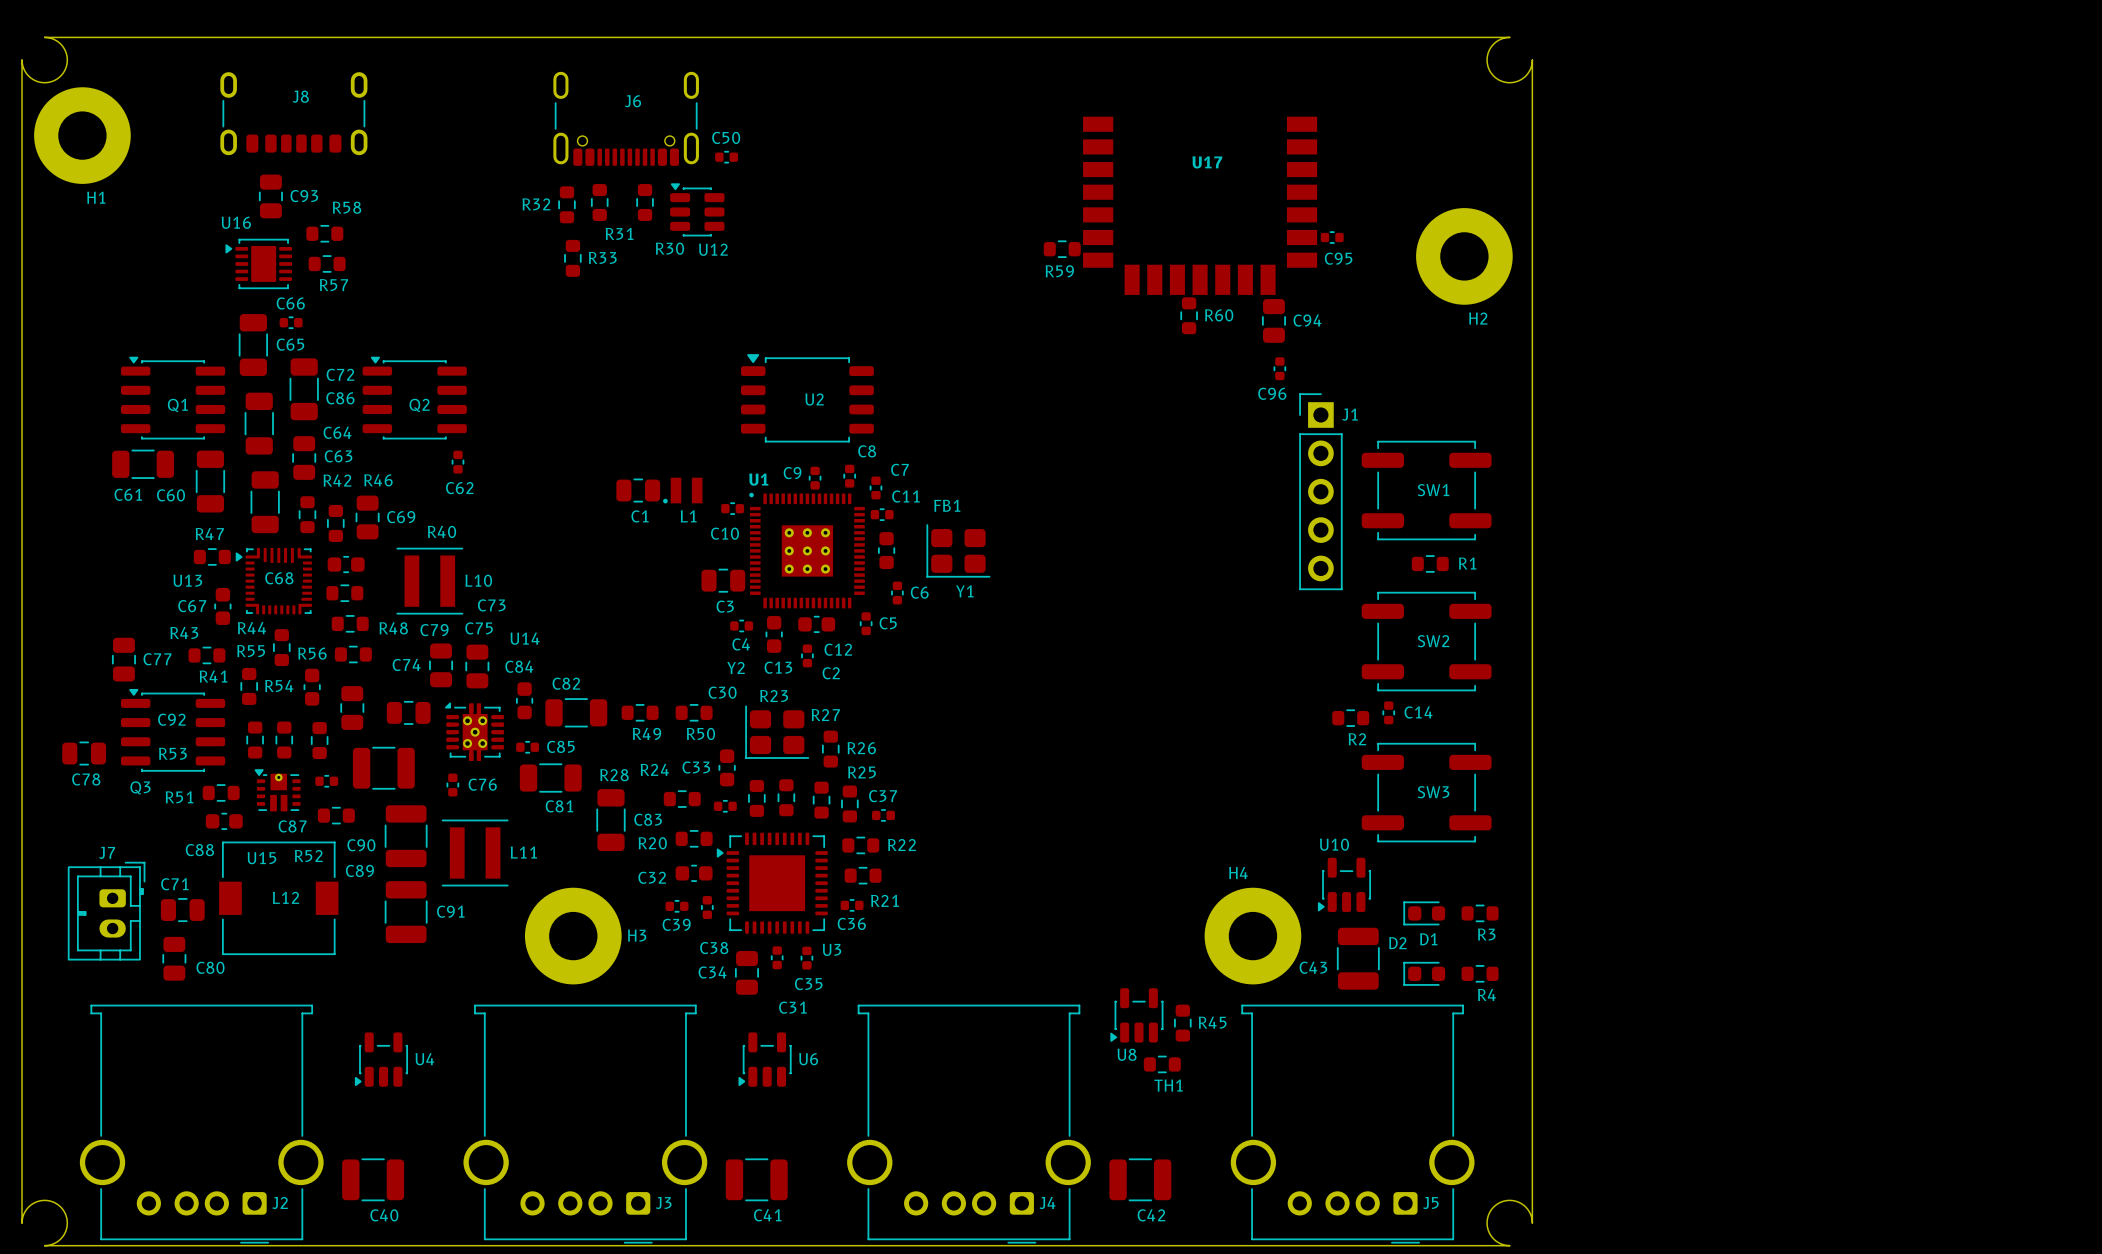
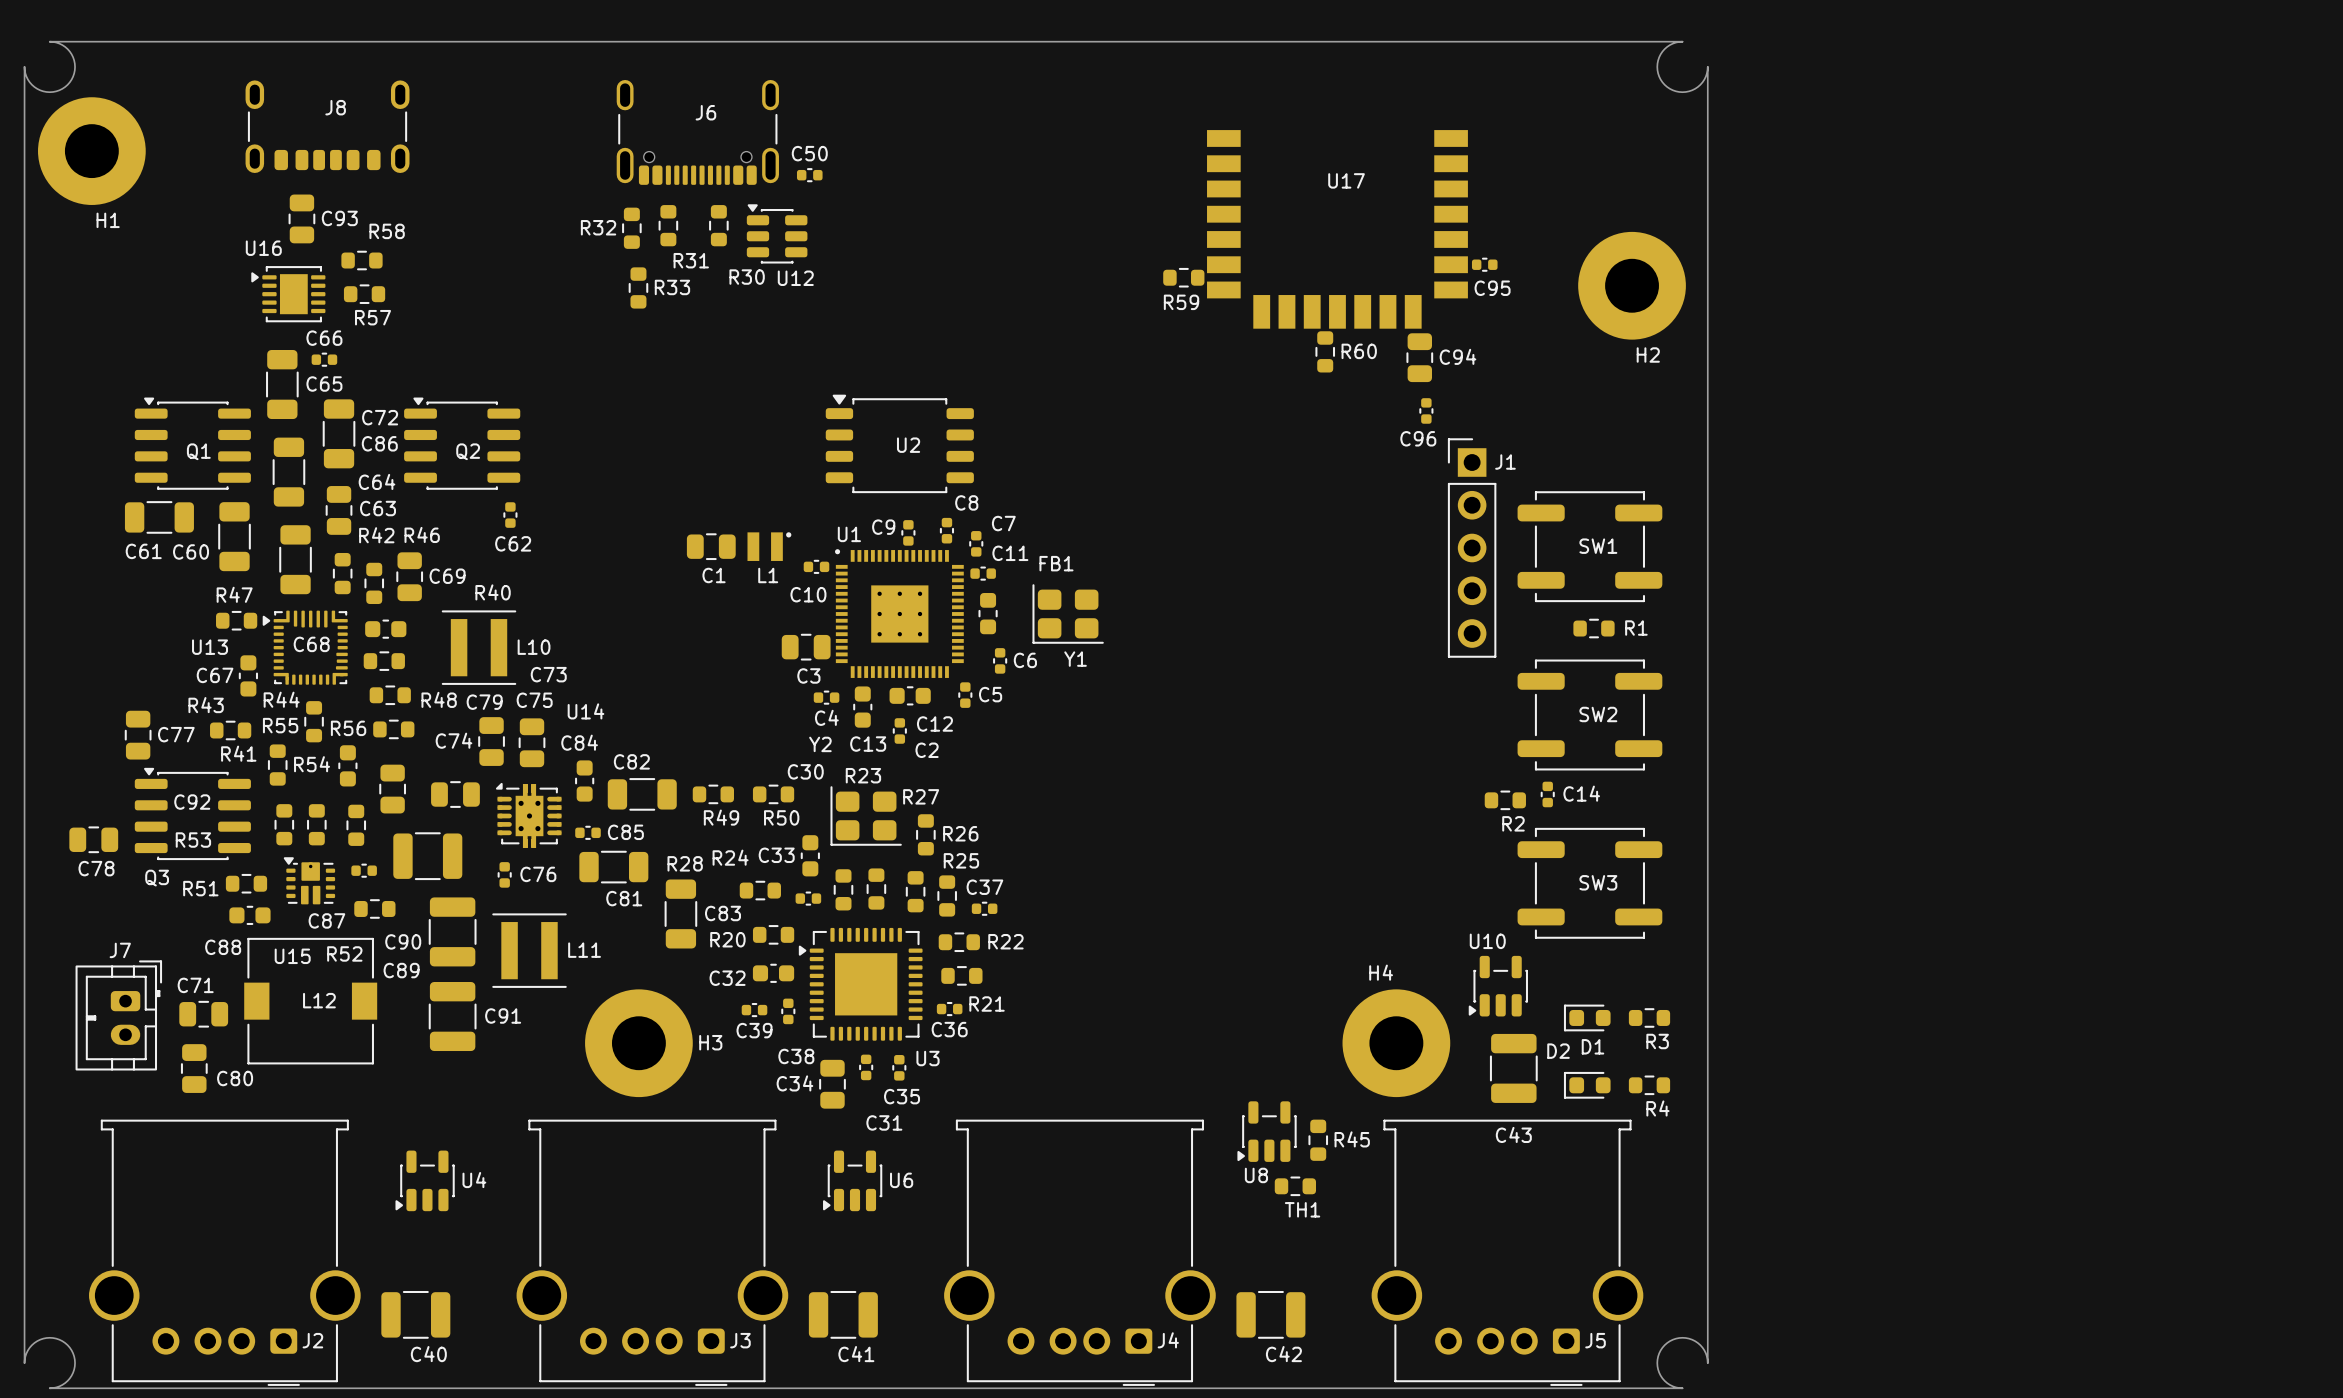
L1 rotation: 0° (682, 490) -> 180° (769, 546)
C43 name position: C43 (1313, 967) -> C43 (1513, 1134)

